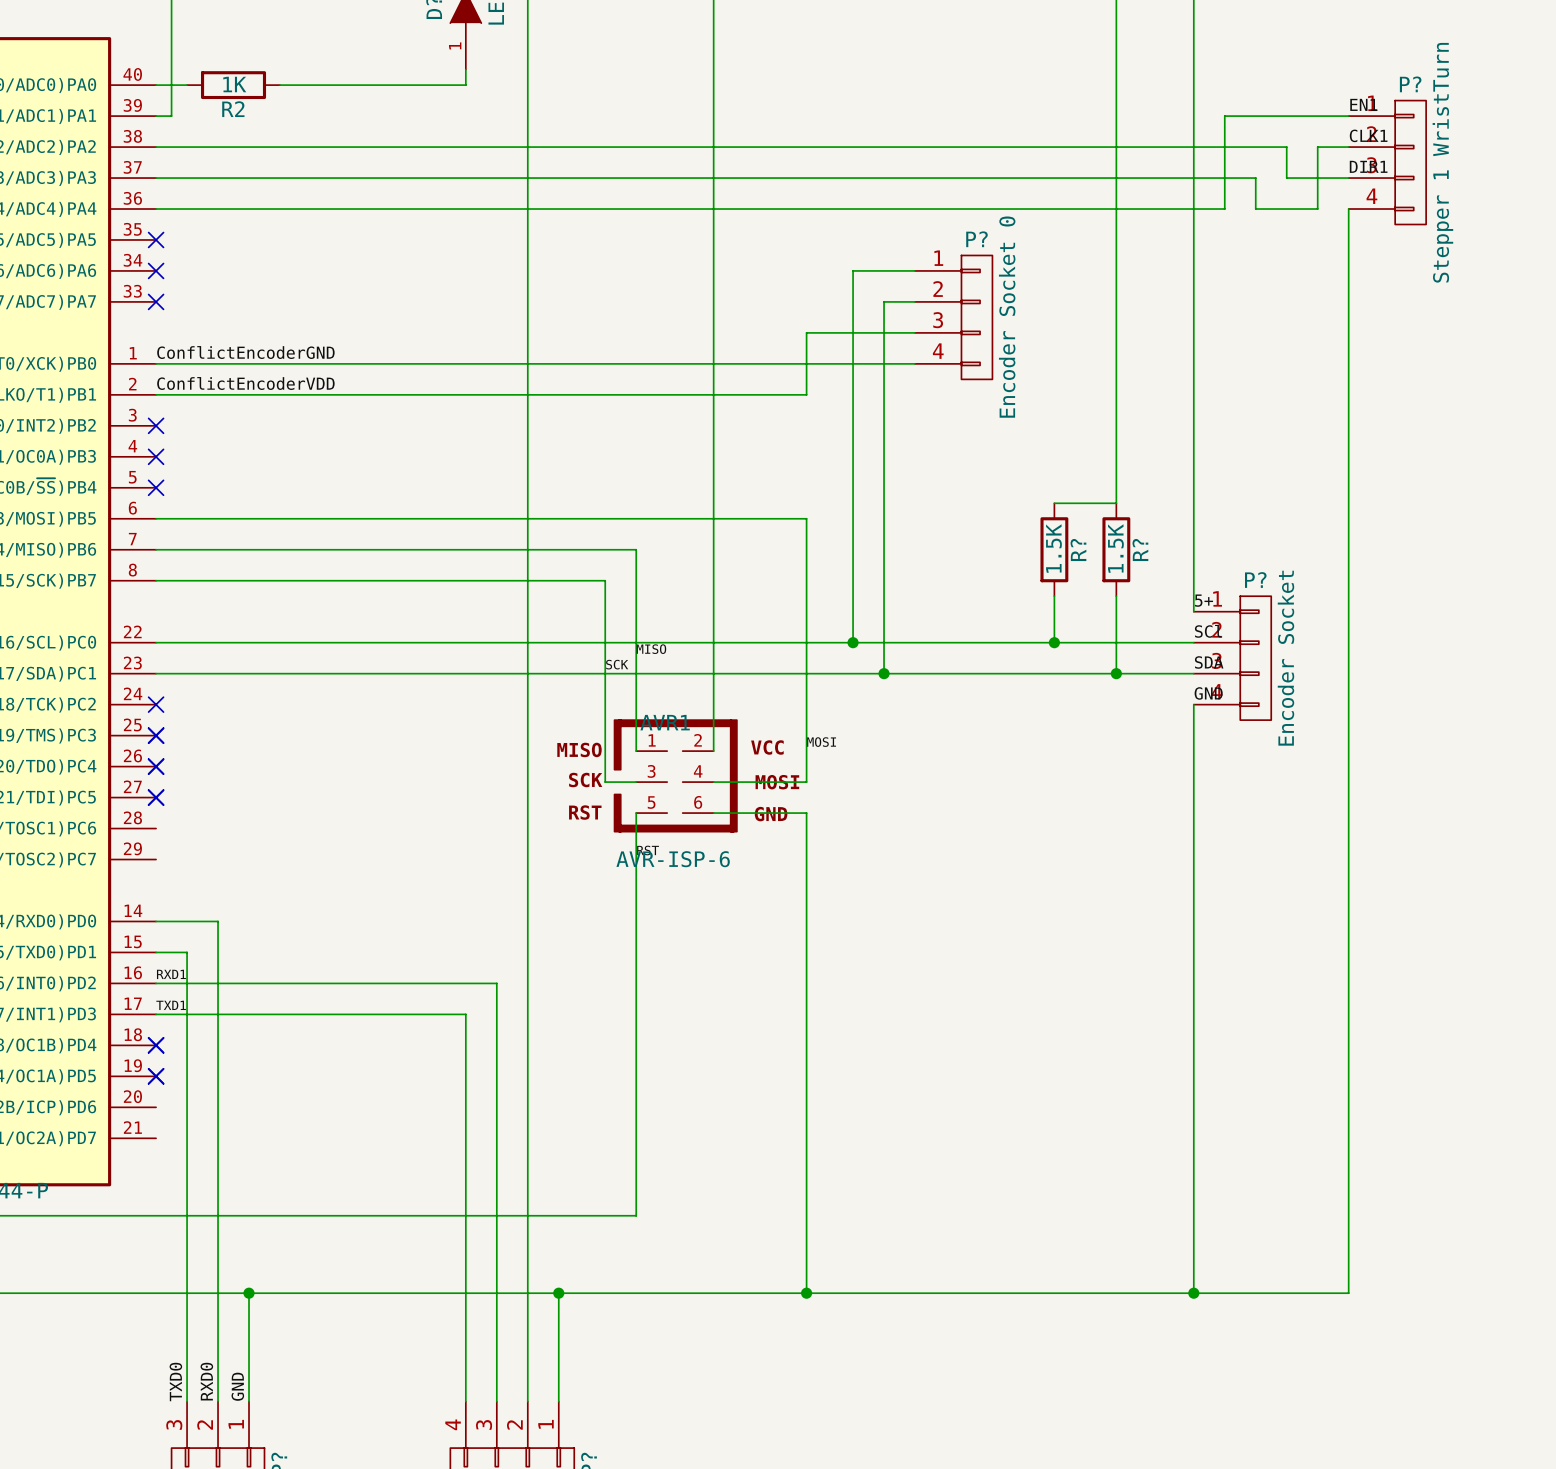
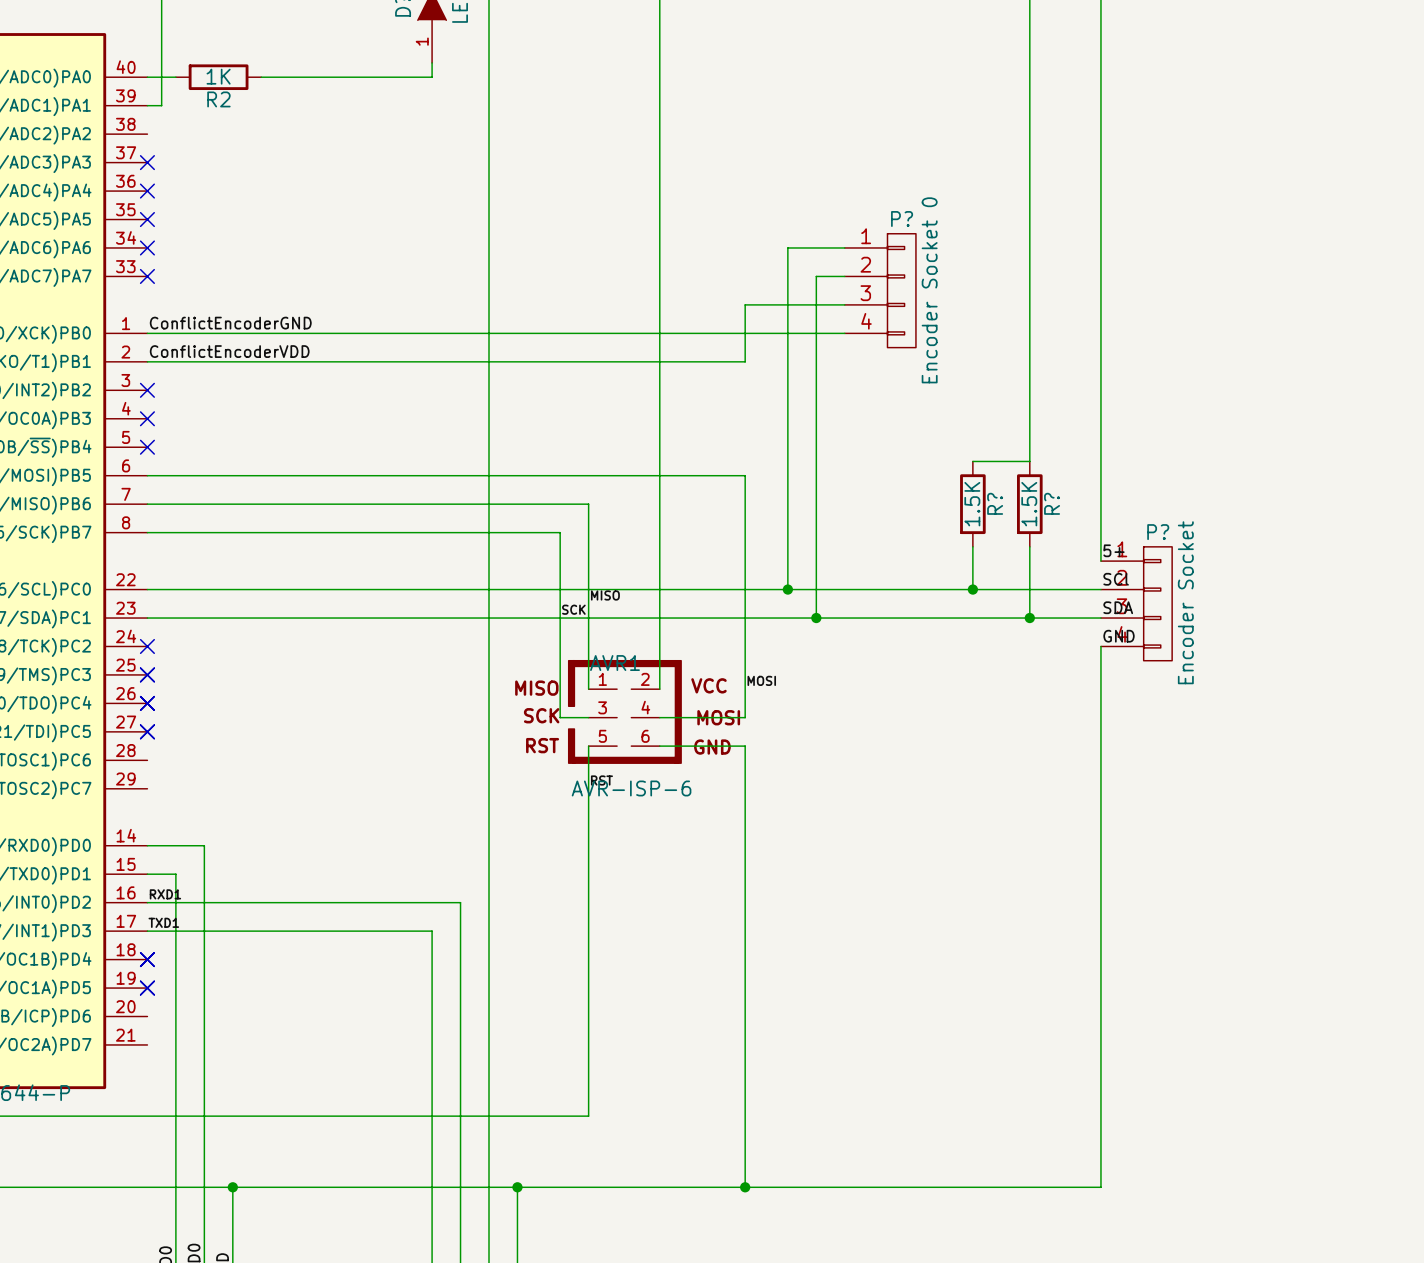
label: EN1 (1363, 104) -> none
wire: (1348, 116) (1224, 116) (1224, 209) (156, 209) -> none
label: CLK1 (1368, 135) -> none
wire: (156, 147) (1286, 147) (1286, 178) (1348, 178) -> none
wire: (1348, 147) (1317, 147) (1317, 209) (1255, 209) (1255, 178) (156, 178) -> none
P?: Stepper 1 WristTurn (1387, 162) -> none
label: DIR1 (1368, 166) -> none
no-connect mark: none -> (147, 162)
no-connect mark: none -> (147, 191)
wire: (1348, 209) (1348, 1293) (1193, 1293) -> none
junction: (1193, 1293) -> none

